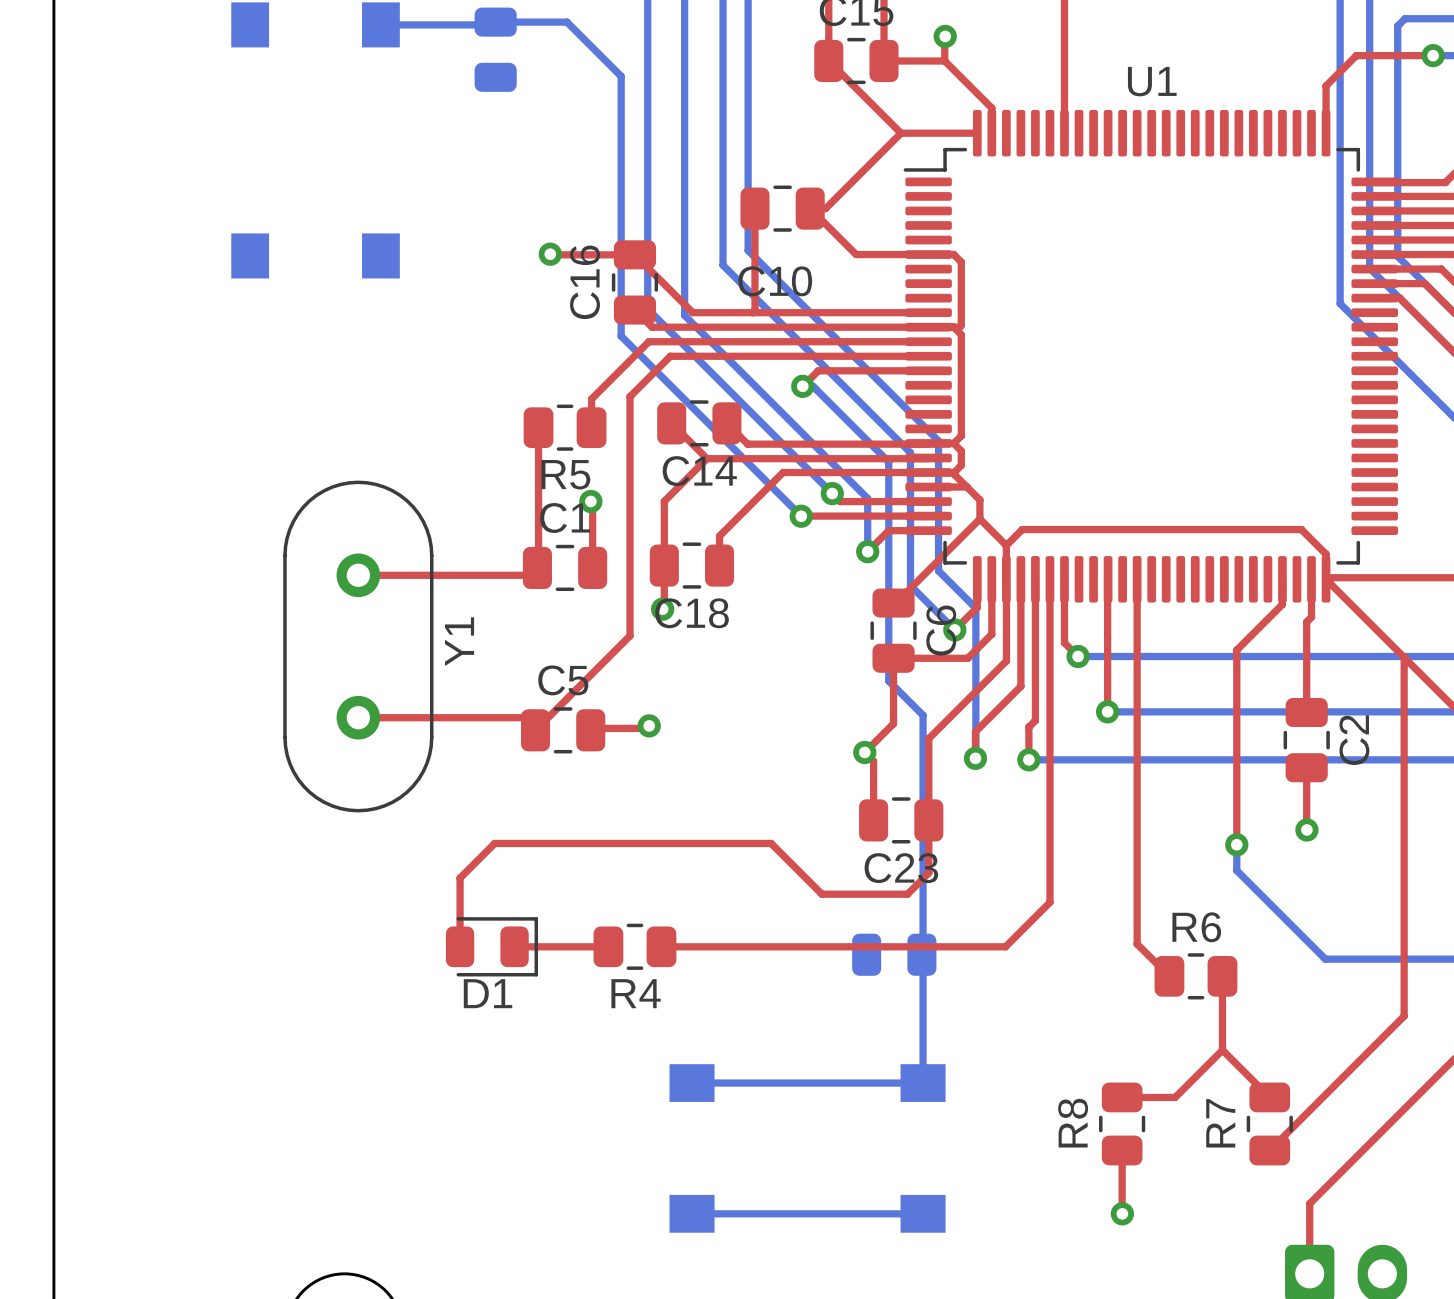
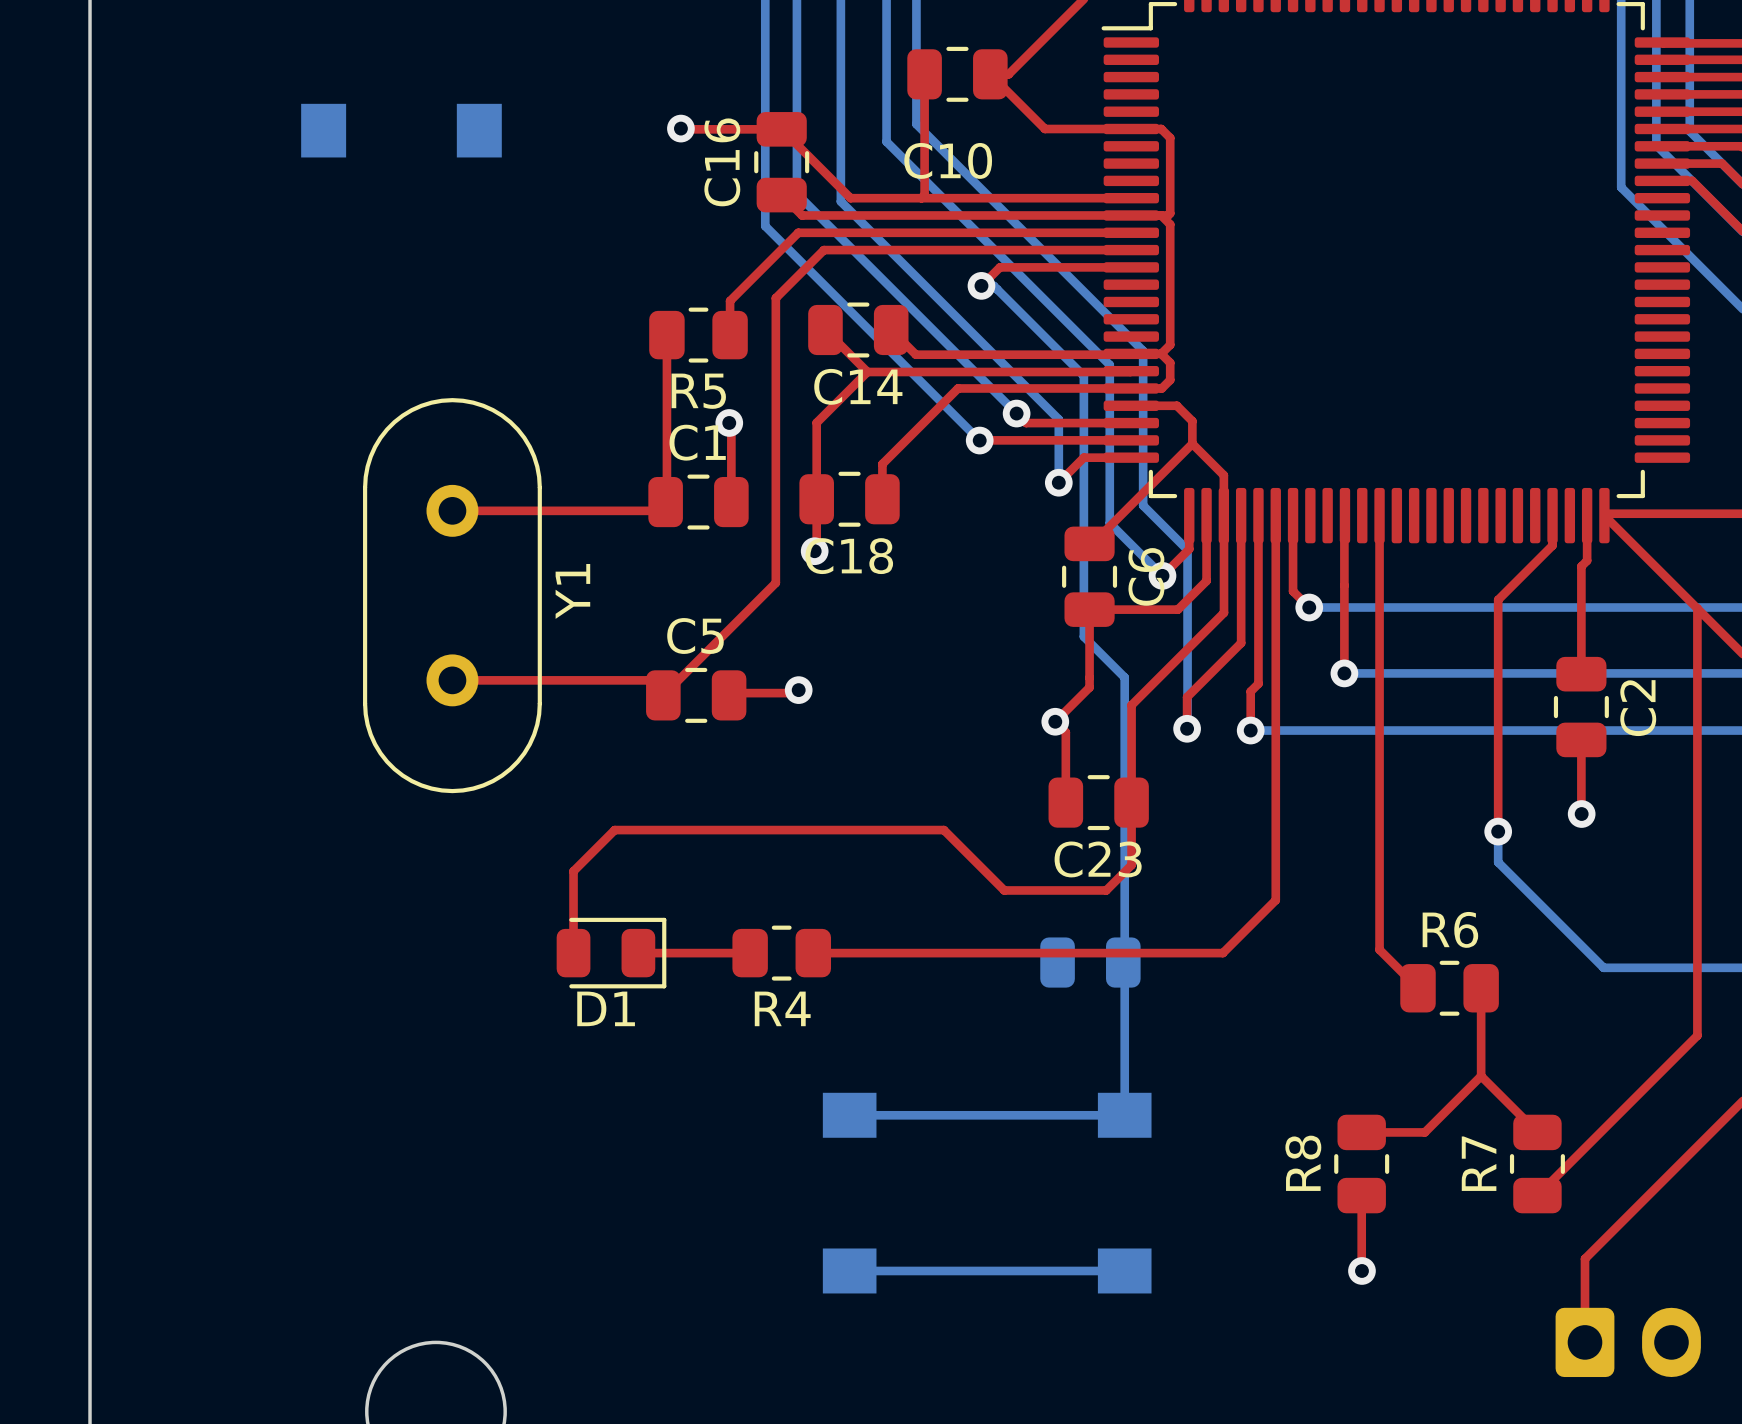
top track: (954, 472) (966, 487) -> none
top track: (1006, 545) (1022, 529) (1301, 529) (1326, 554) (1326, 579) -> none

